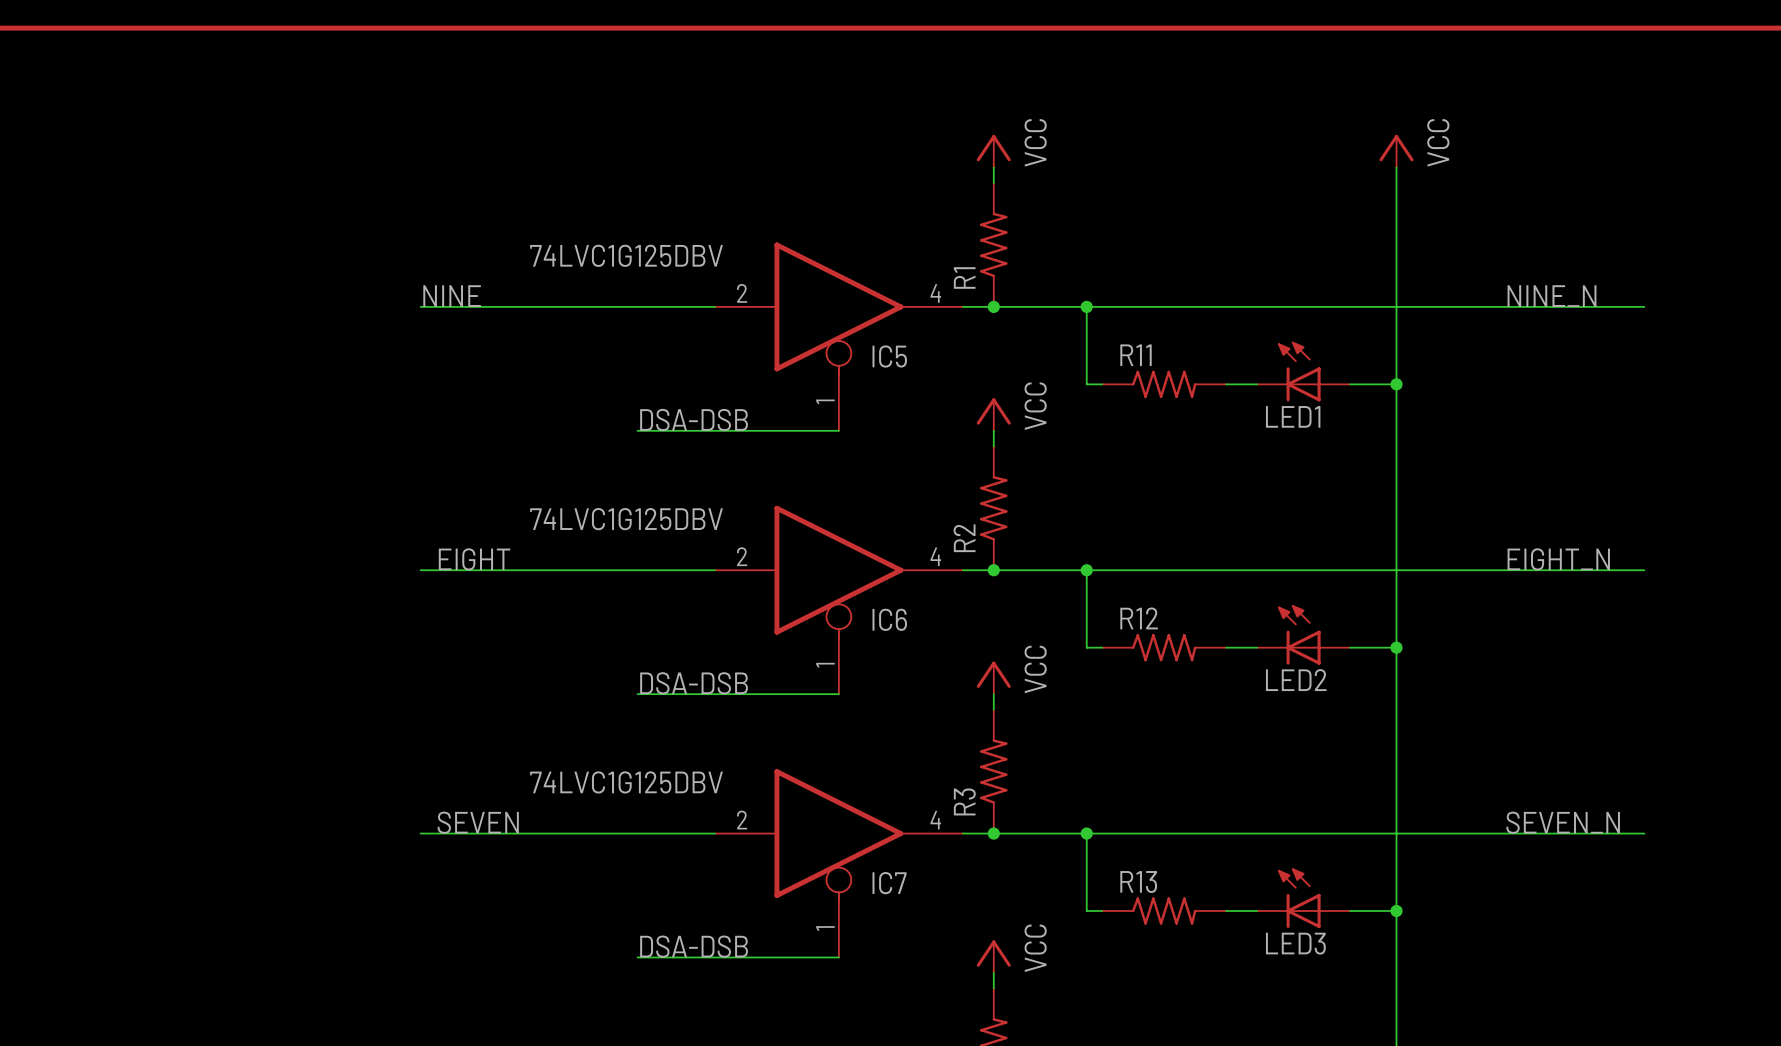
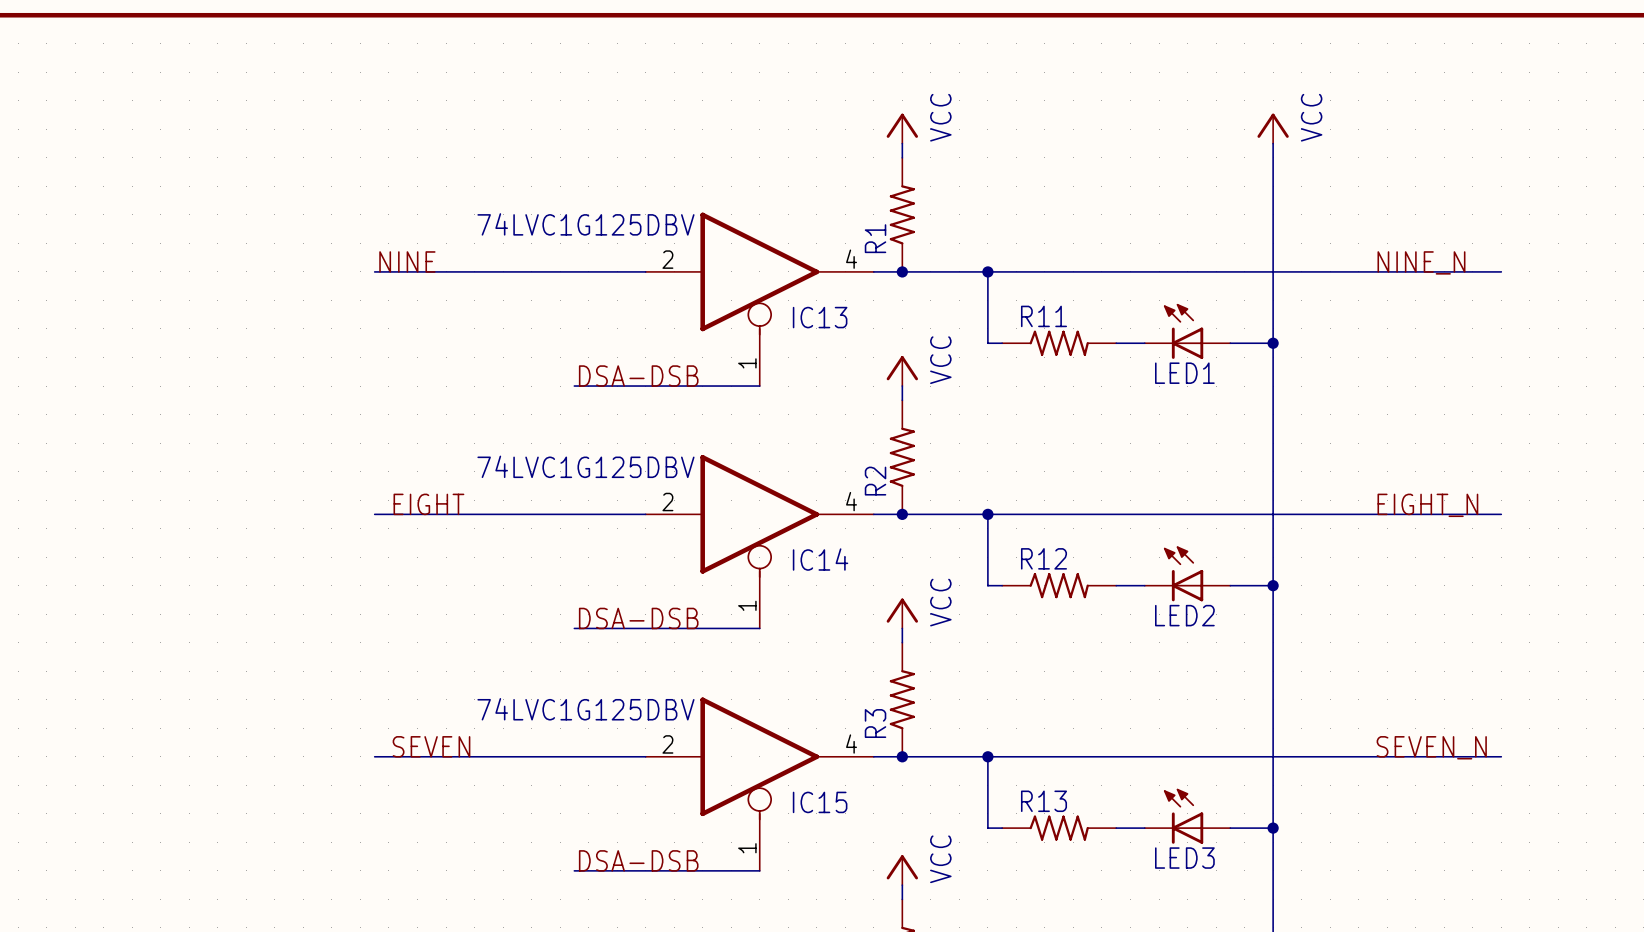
IC5 name: IC5 (889, 356) -> IC13 (820, 317)
IC6 name: IC6 (889, 619) -> IC14 (820, 559)
IC7 name: IC7 (889, 883) -> IC15 (820, 802)

